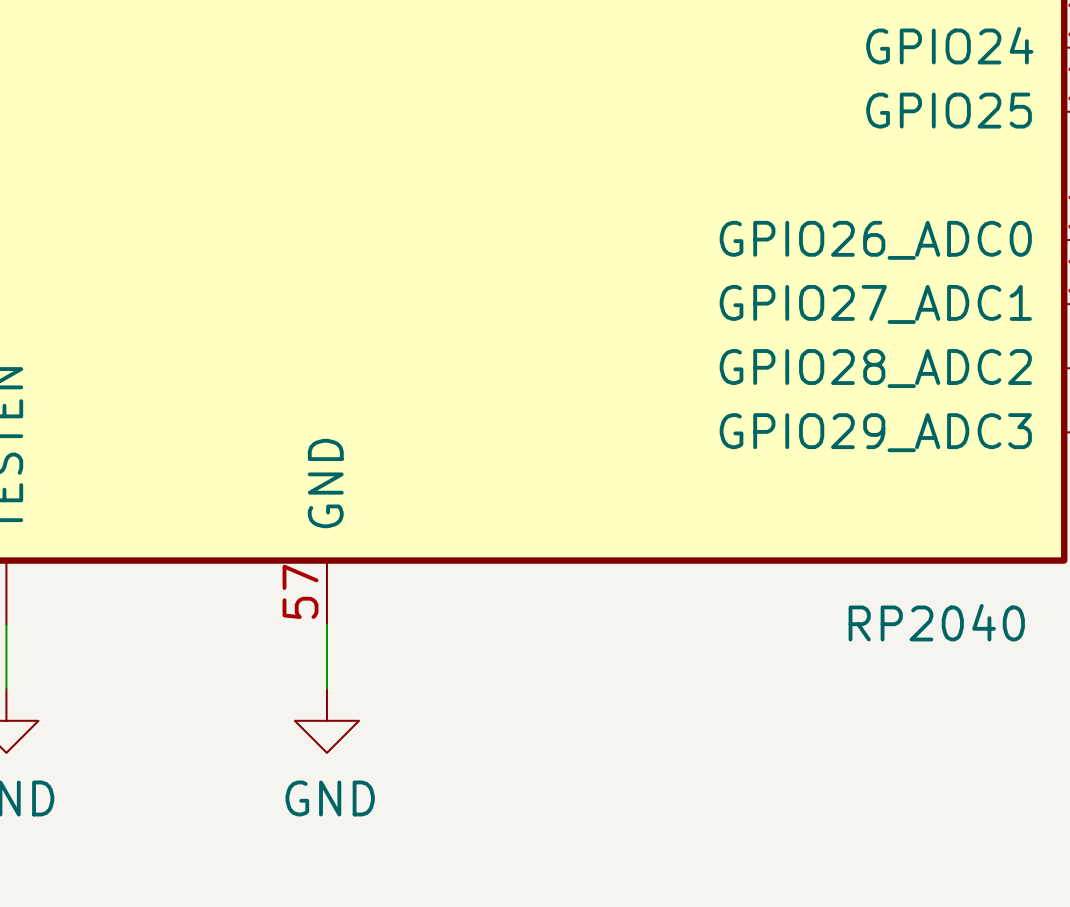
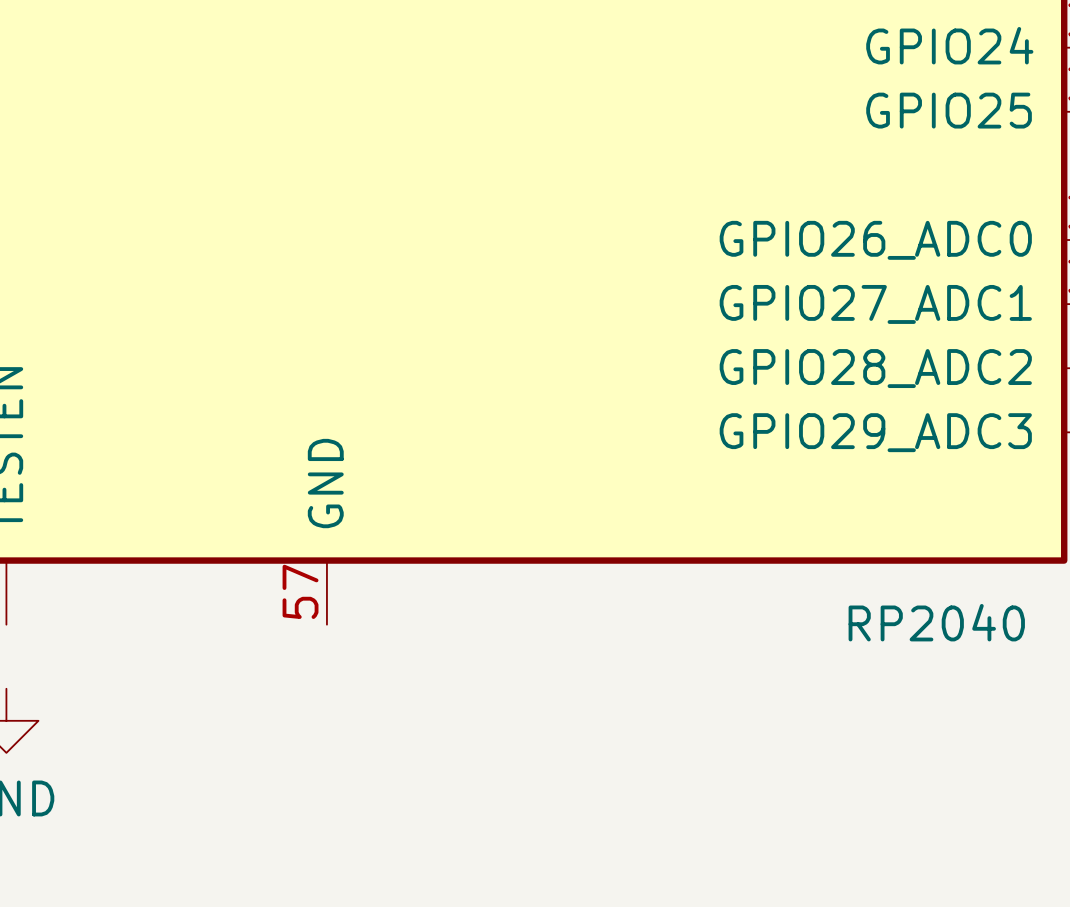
wire: (6, 624) (6, 688) -> none
wire: (326, 624) (326, 688) -> none
power symbol: GND (326, 720) -> none

